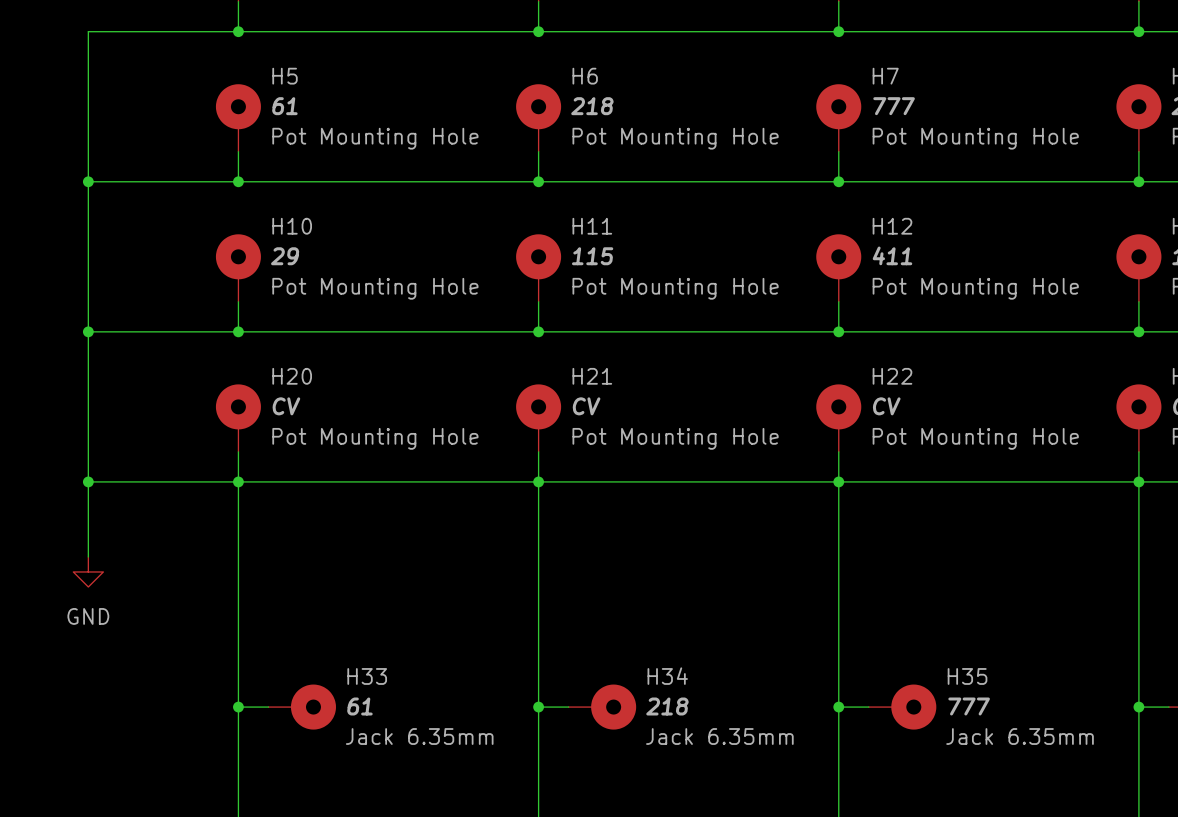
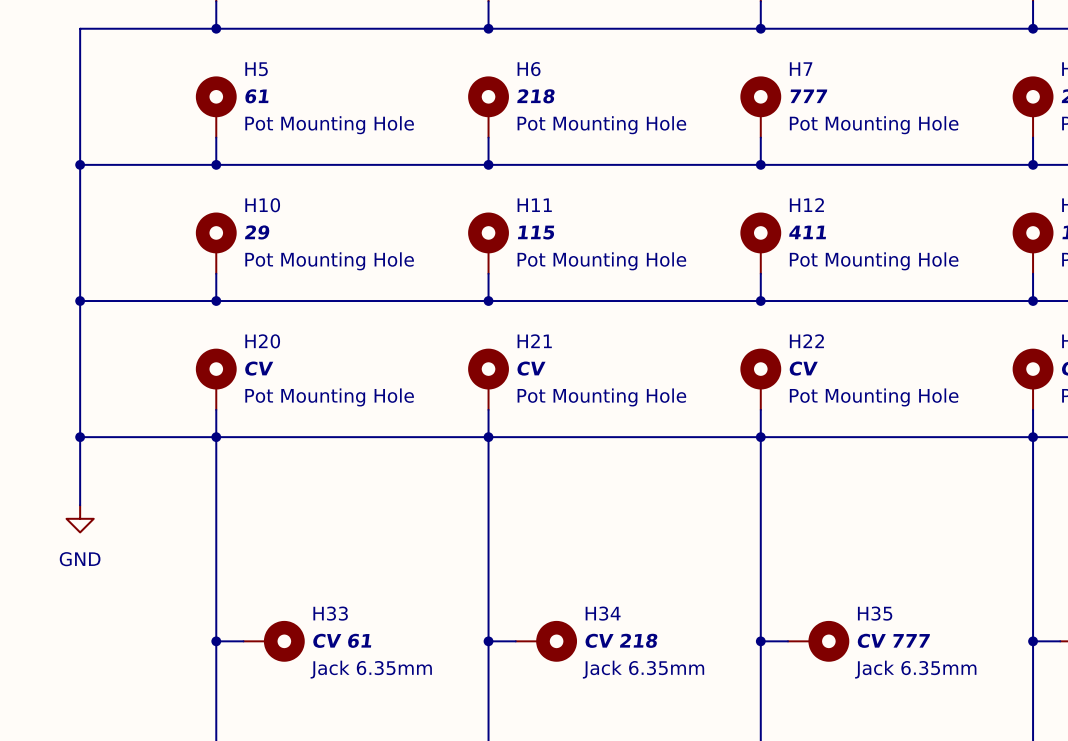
H33 value: 61 (359, 706) -> CV 61 (342, 640)
H34 value: 218 (667, 706) -> CV 218 (621, 640)
H35 value: 777 (969, 706) -> CV 777 (893, 640)

